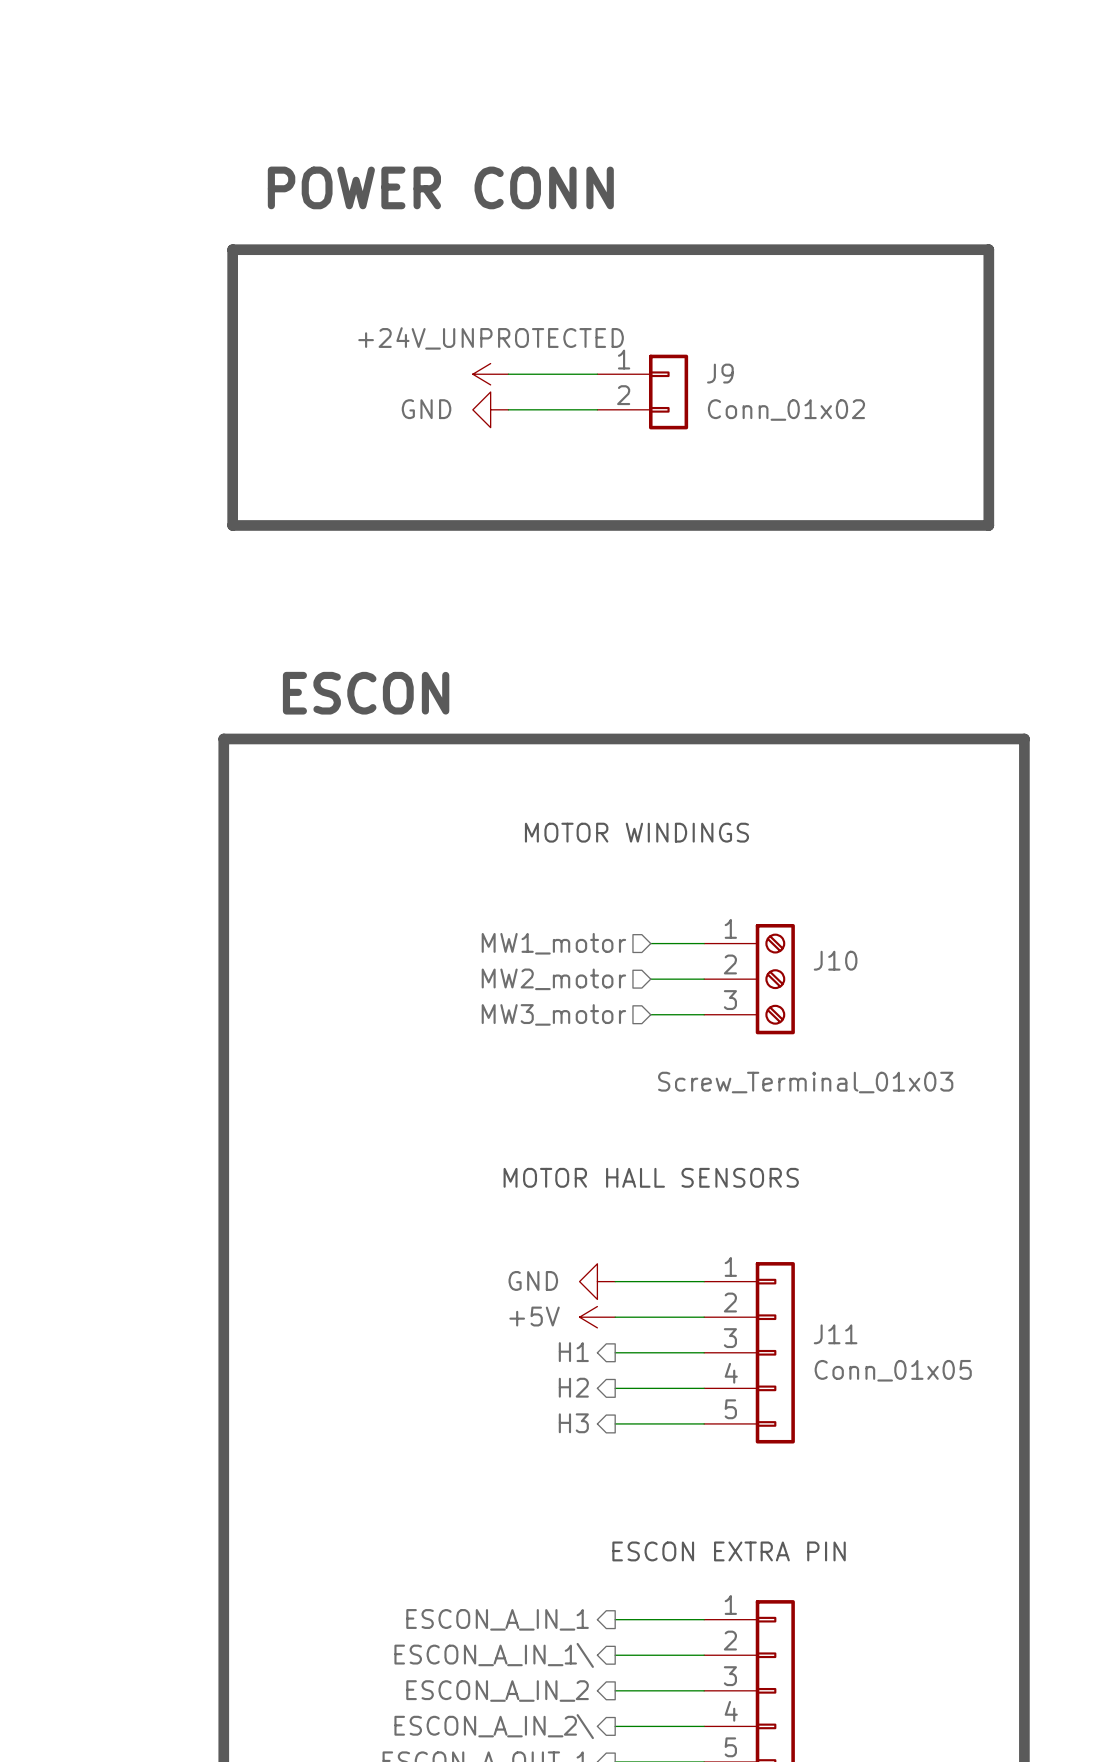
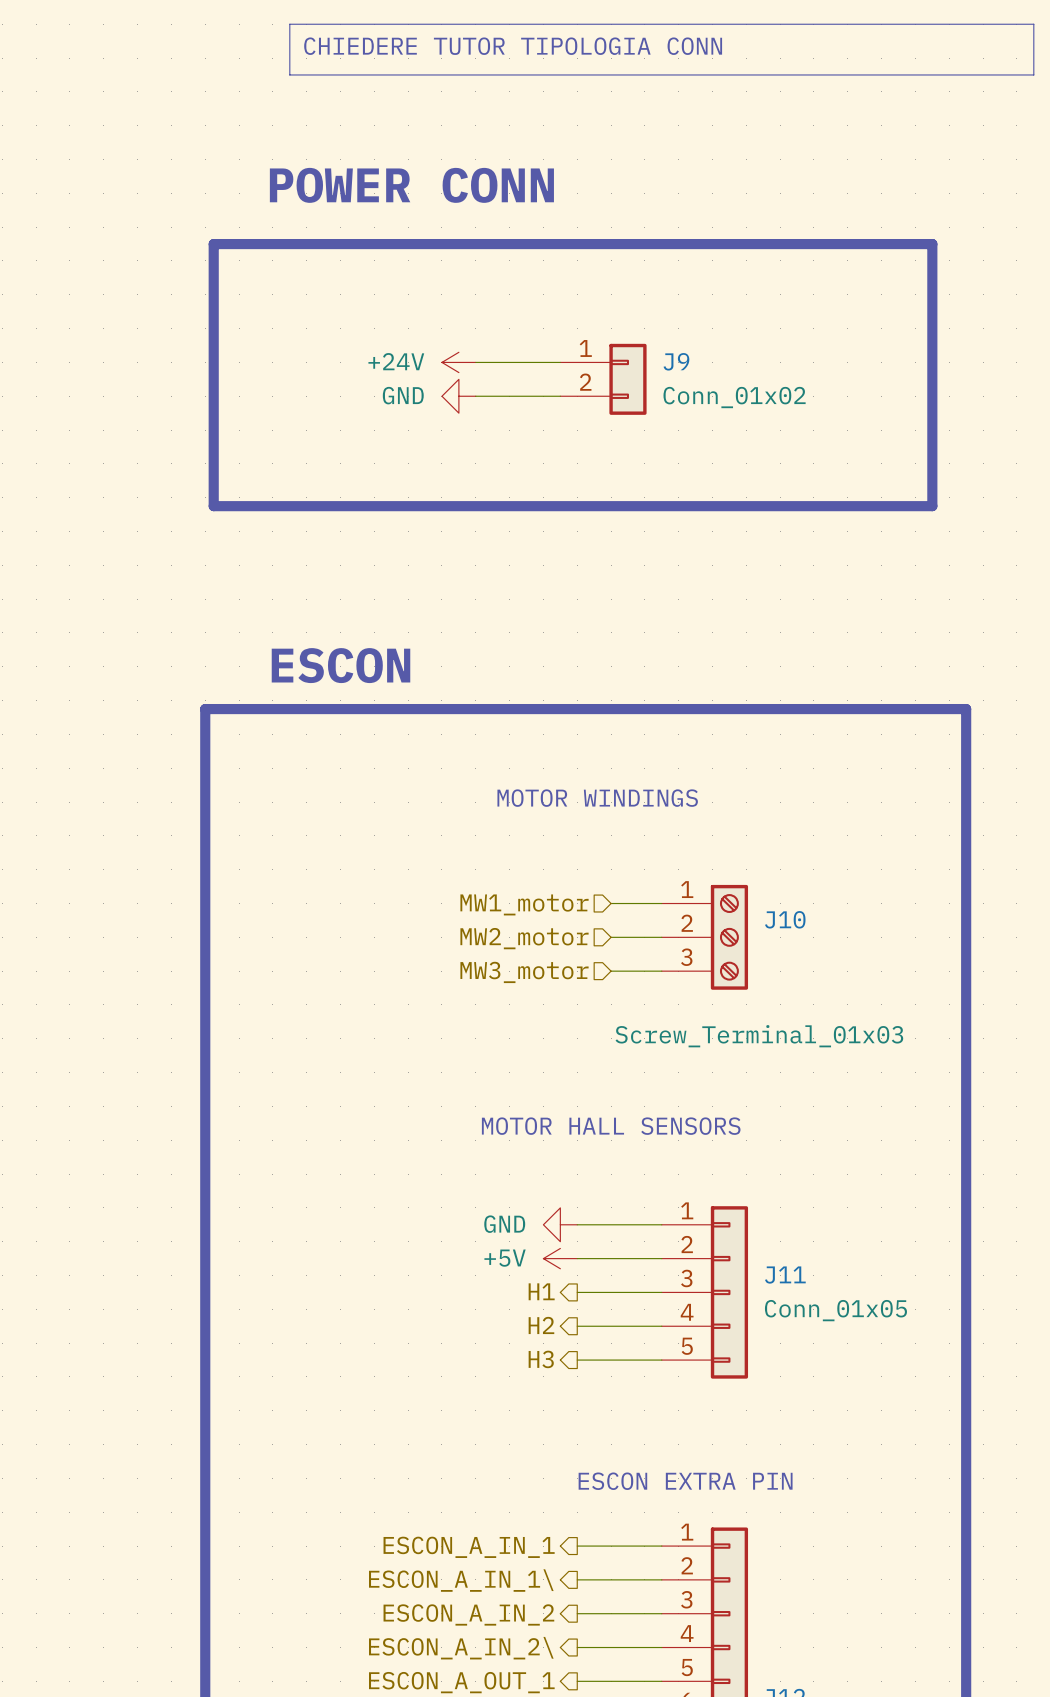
line: none -> (289, 24) (1033, 24) (1033, 74) (289, 74) (289, 24)
text: none -> CHIEDERE TUTOR TIPOLOGIA CONN (513, 46)
power symbol: +24V_UNPROTECTED (490, 374) -> +24V (458, 362)

